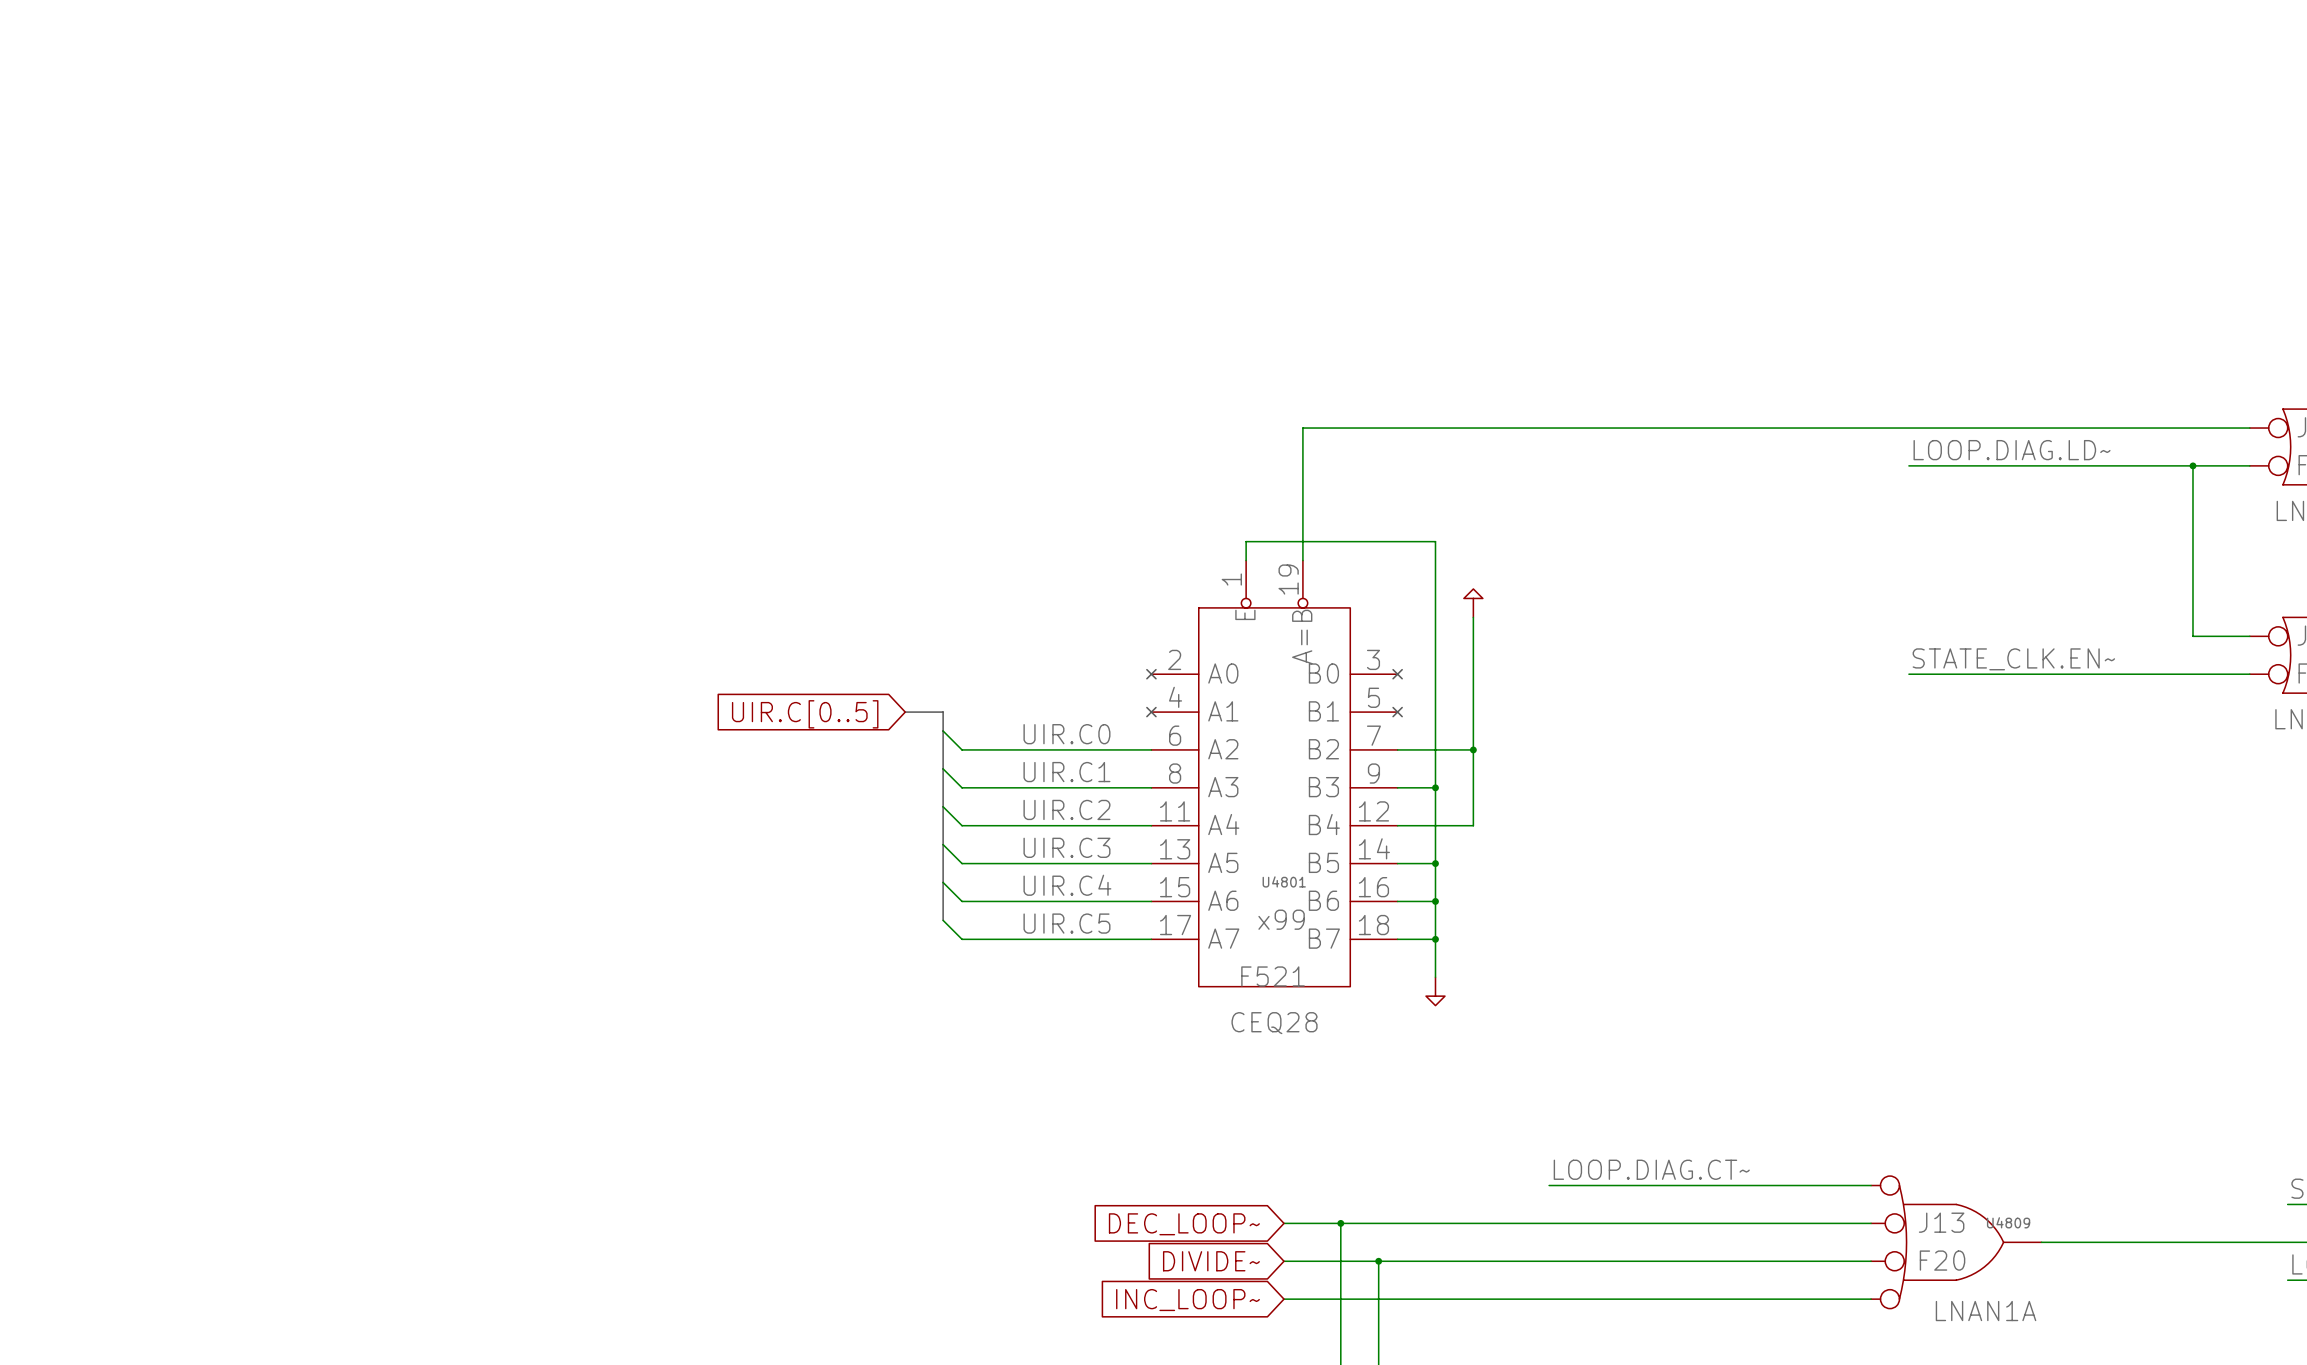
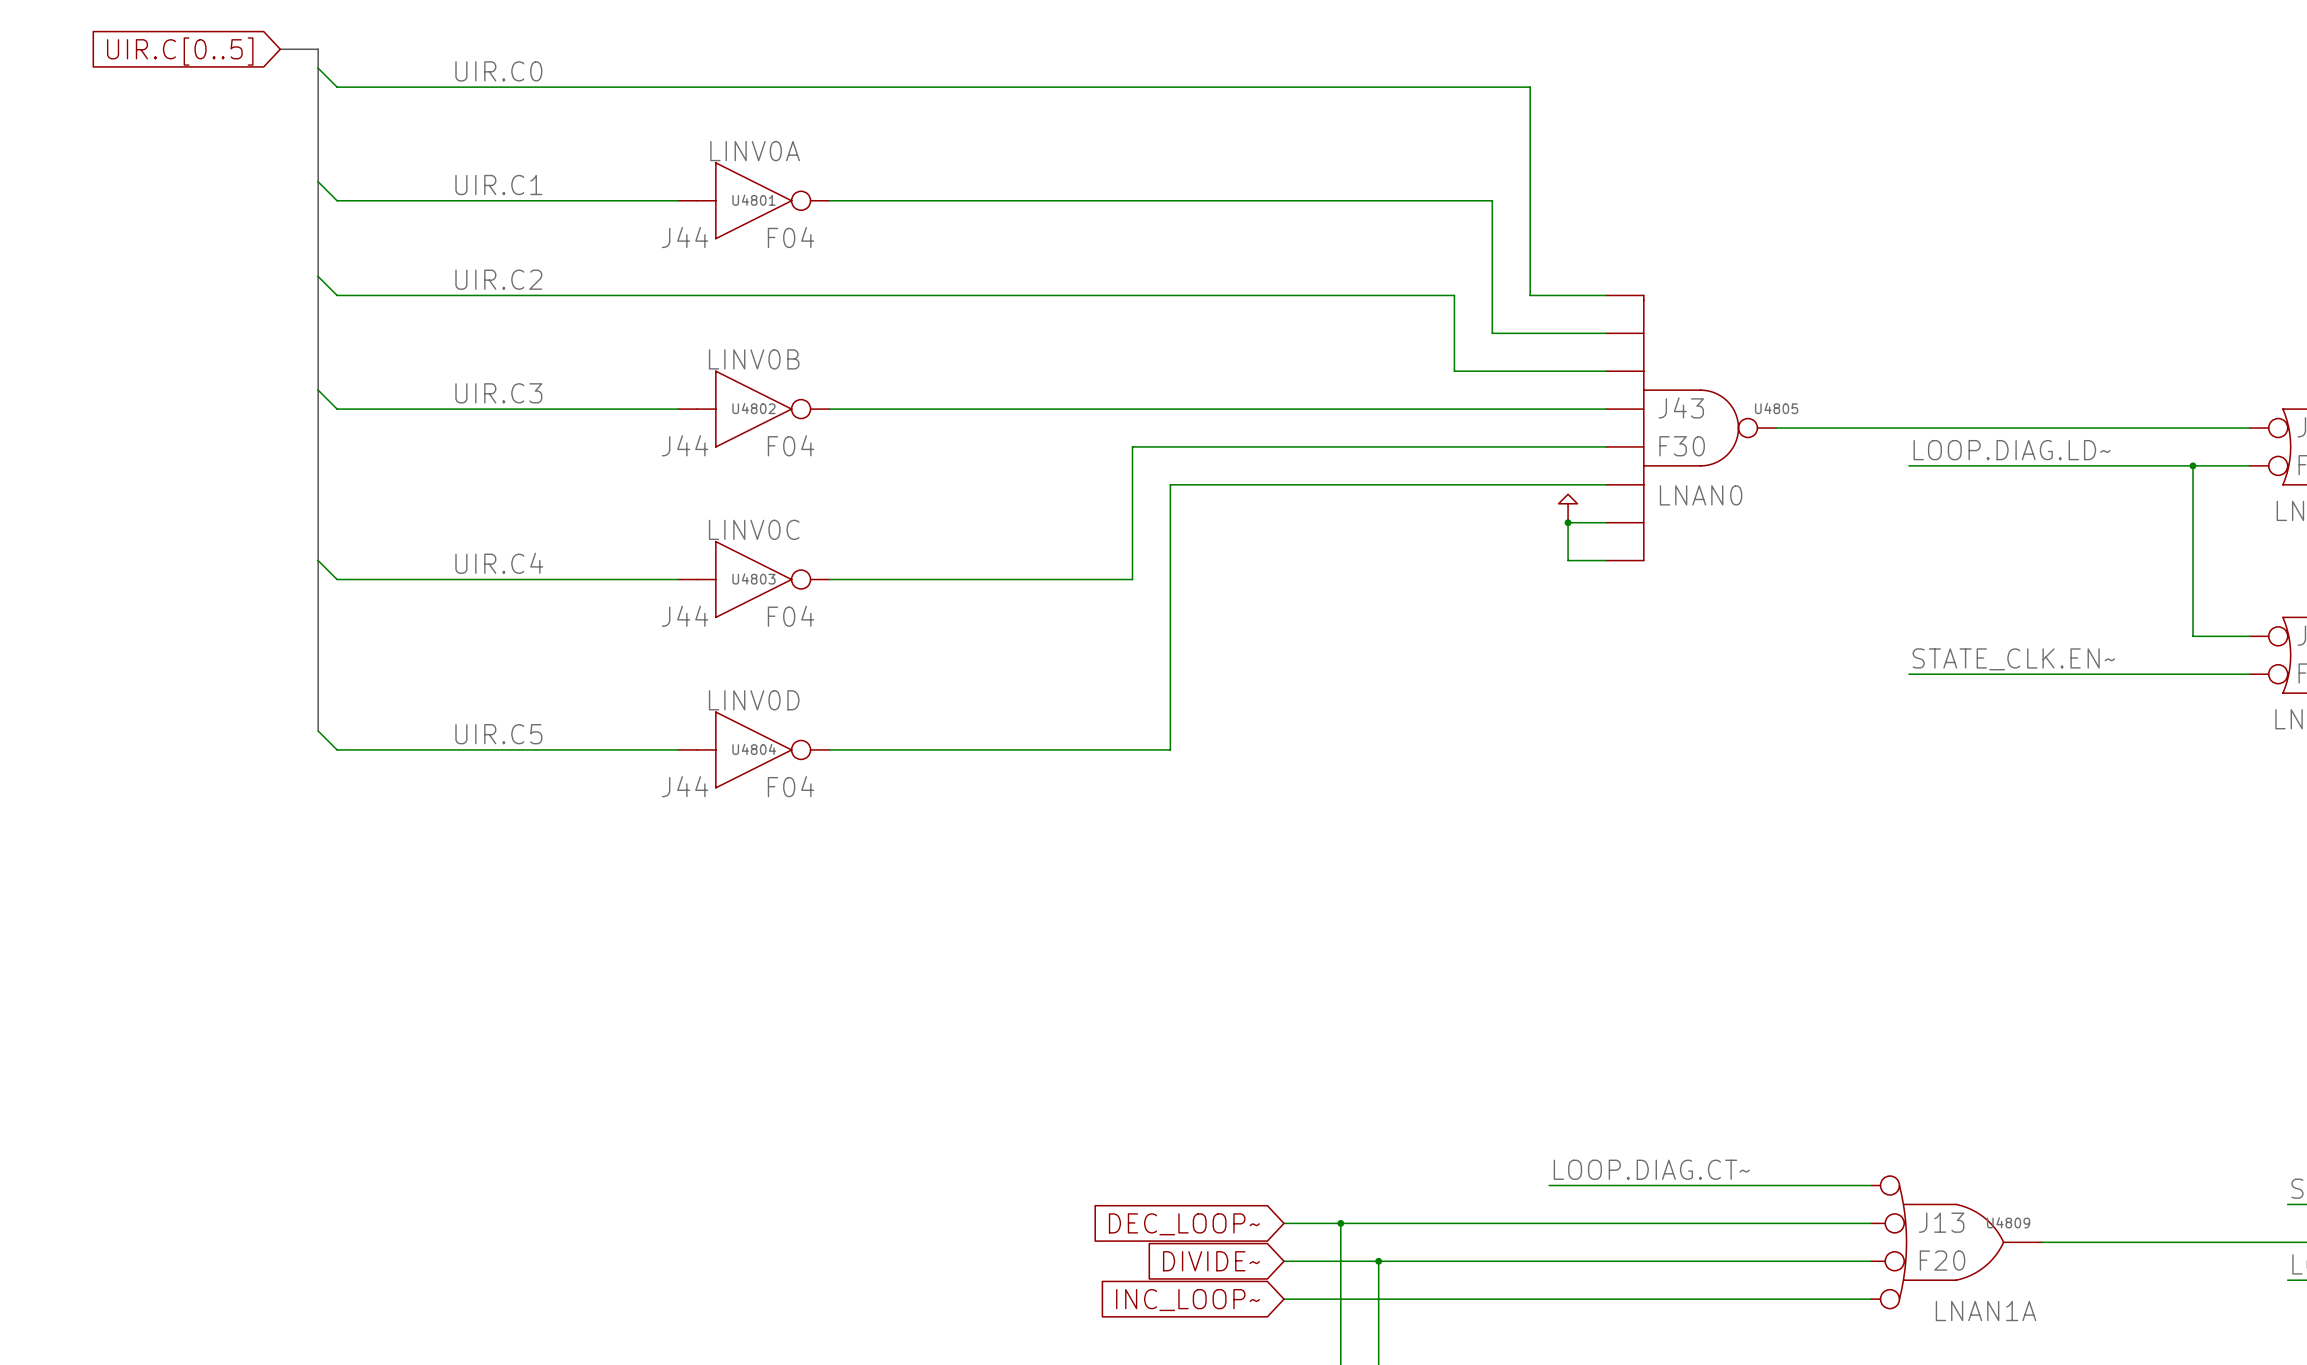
bus: none -> (280, 49) (318, 49) (318, 731)
global label: none -> UIR.C[0..5] (180, 51)
wire: none -> (318, 68) (337, 87) (1530, 87) (1530, 295) (1605, 295)
label: none -> UIR.C0 (498, 71)
wire: none -> (318, 181) (337, 200) (677, 200)
label: none -> UIR.C1 (498, 185)
wire: none -> (829, 200) (1492, 200) (1492, 333) (1605, 333)
wire: none -> (318, 276) (337, 295) (1454, 295) (1454, 371) (1605, 371)
label: none -> UIR.C2 (498, 279)
wire: none -> (318, 390) (337, 409) (677, 409)
label: none -> UIR.C3 (498, 393)
U4802: none -> F04 (753, 409)
wire: none -> (829, 409) (1605, 409)
U4805: none -> F30 (1691, 428)
wire: (1776, 428) (1302, 428) (1302, 560) -> none
wire: none -> (1605, 446) (1132, 446) (1132, 579) (829, 579)
wire: none -> (1605, 484) (1170, 484) (1170, 749) (1151, 749)
junction: none -> (1568, 522)
wire: none -> (1605, 522) (1568, 522) (1568, 560) (1605, 560)
wire: none -> (318, 560) (337, 579) (677, 579)
U4801 symbol: [1151, 560, 1398, 987] -> [677, 162, 830, 240]
wire: (1246, 560) (1246, 541) (1435, 541) (1435, 977) -> none
label: none -> UIR.C4 (499, 563)
U4803: none -> F04 (753, 579)
power symbol position: (1473, 602) -> (1568, 508)
wire: (1473, 617) (1473, 825) (1397, 825) -> none
no-connect mark: (1151, 674) -> none
no-connect mark: (1397, 674) -> none
bus: (905, 712) (943, 712) (943, 920) -> none
no-connect mark: (1151, 712) -> none
no-connect mark: (1397, 712) -> none
global label: UIR.C[0..5] (805, 714) -> none
wire: none -> (318, 731) (337, 749) (677, 749)
wire: (943, 731) (962, 749) -> (829, 749) (962, 749)
label: none -> UIR.C5 (498, 734)
label: UIR.C0 (1066, 734) -> none
U4804: none -> F04 (753, 749)
wire: (1397, 749) (1473, 749) -> none
junction: (1473, 749) -> none
wire: (943, 768) (962, 787) (1151, 787) -> none
label: UIR.C1 (1066, 772) -> none
wire: (1397, 787) (1435, 787) -> none
junction: (1435, 787) -> none
wire: (943, 806) (962, 825) (1151, 825) -> none
label: UIR.C2 (1066, 809) -> none
wire: (943, 844) (962, 863) (1151, 863) -> none
label: UIR.C3 (1066, 847) -> none
wire: (1397, 863) (1435, 863) -> none
junction: (1435, 863) -> none
U4801 name position: U4801 (1284, 881) -> U4801 (753, 200)
wire: (943, 882) (962, 901) (1151, 901) -> none
label: UIR.C4 (1067, 885) -> none
wire: (1397, 901) (1435, 901) -> none
junction: (1435, 901) -> none
U4801 text: x99 (1281, 919) -> J44 (685, 237)
wire: (943, 920) (962, 939) (1151, 939) -> none
label: UIR.C5 (1066, 923) -> none
wire: (1397, 939) (1435, 939) -> none
junction: (1435, 939) -> none
U4801 value: F521 (1273, 976) -> F04 (791, 237)
power symbol: (1435, 991) -> none
U4801 text: CEQ28 (1274, 1023) -> LINV0A (755, 151)

